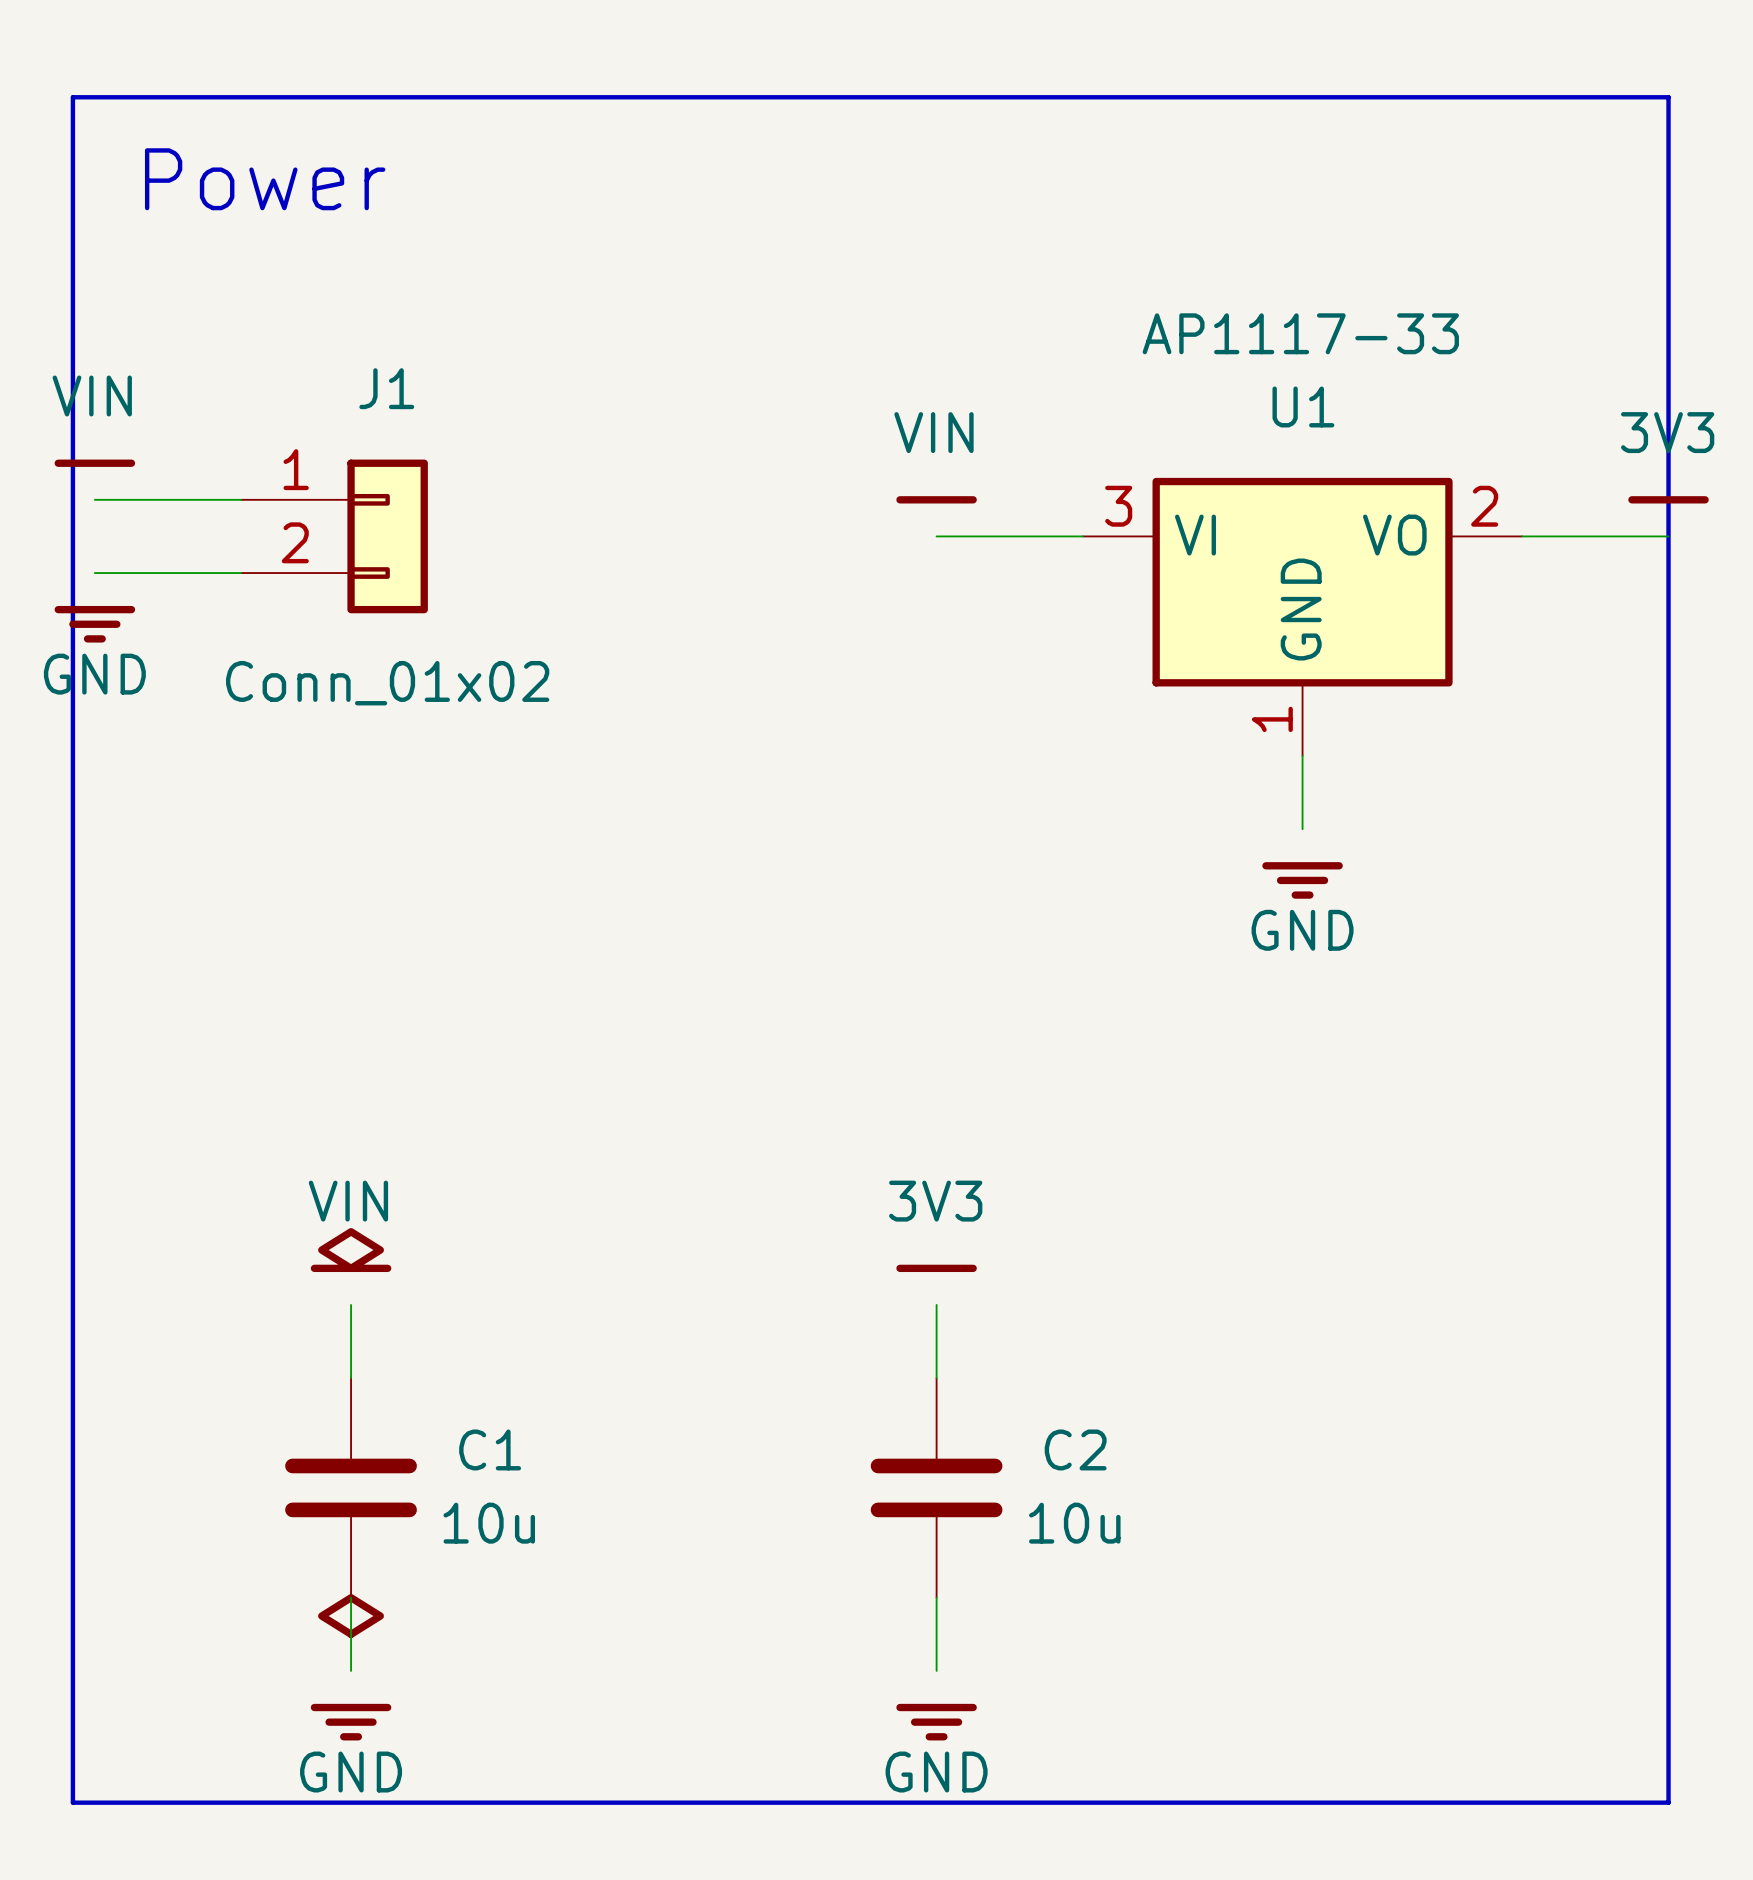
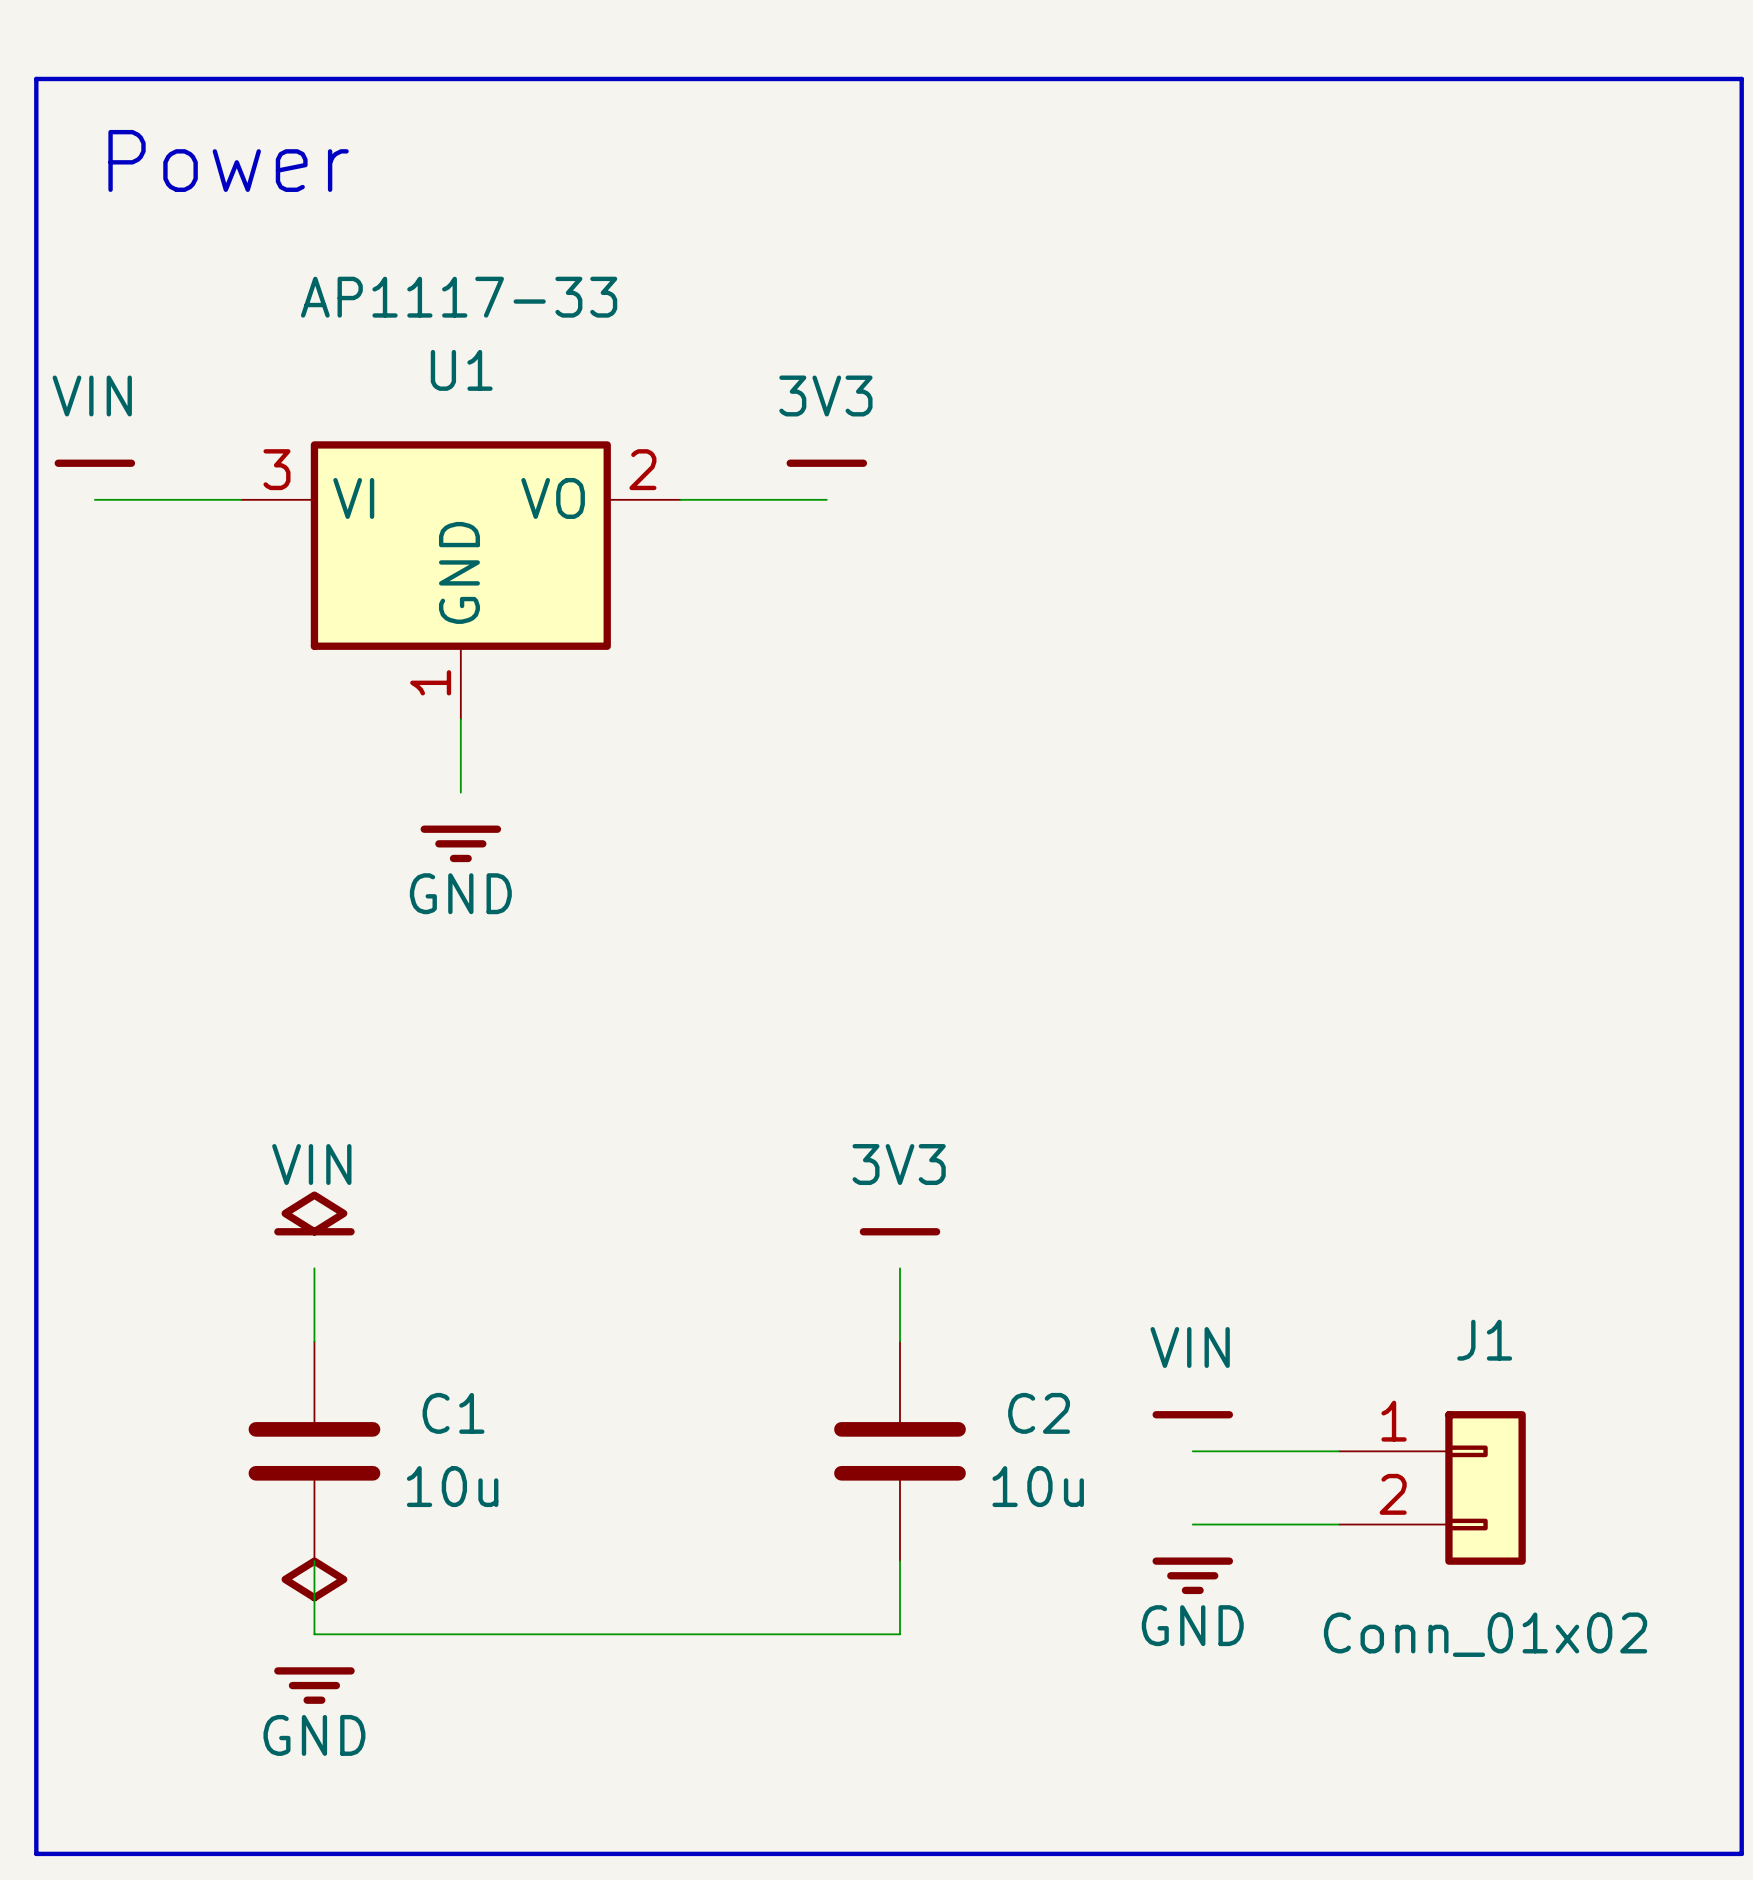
line: (72, 97) (1668, 97) (1668, 1802) (72, 1802) (72, 97) -> (36, 78) (36, 1853) (1741, 1853) (1741, 78) (36, 78)
text position: Power (265, 179) -> Power (228, 160)
power symbol: none -> 3V3 (826, 463)
power symbol: VIN (936, 499) -> none
power symbol: 3V3 (1668, 499) -> none
J1 position: (334, 536) -> (1432, 1487)
wire: (936, 536) (1082, 536) -> (680, 499) (826, 499)
wire: (1522, 536) (1668, 536) -> none
wire: (94, 573) (241, 573) -> none
U1 position: (1302, 616) -> (460, 580)
power symbol: GND (94, 624) -> none
wire: none -> (460, 719) (460, 792)
wire: (1302, 756) (1302, 829) -> none
power symbol: none -> GND (460, 843)
power symbol: GND (1302, 880) -> none
power symbol position: (351, 1250) -> (314, 1213)
power symbol position: VIN (351, 1268) -> VIN (314, 1231)
power symbol position: 3V3 (936, 1268) -> 3V3 (899, 1231)
wire: (351, 1304) (351, 1378) -> (314, 1268) (314, 1341)
wire: (936, 1304) (936, 1378) -> (899, 1268) (899, 1341)
power symbol: none -> VIN (1192, 1414)
wire: none -> (1192, 1451) (1339, 1451)
C1 position: (351, 1487) -> (314, 1451)
C2 position: (936, 1487) -> (899, 1451)
wire: none -> (1192, 1524) (1339, 1524)
wire: none -> (314, 1561) (314, 1634) (899, 1634) (899, 1561)
wire: (351, 1597) (351, 1670) -> none
wire: (936, 1597) (936, 1670) -> none
power symbol position: (351, 1616) -> (314, 1579)
power symbol position: GND (351, 1722) -> GND (314, 1685)
power symbol position: GND (936, 1722) -> GND (1192, 1575)

